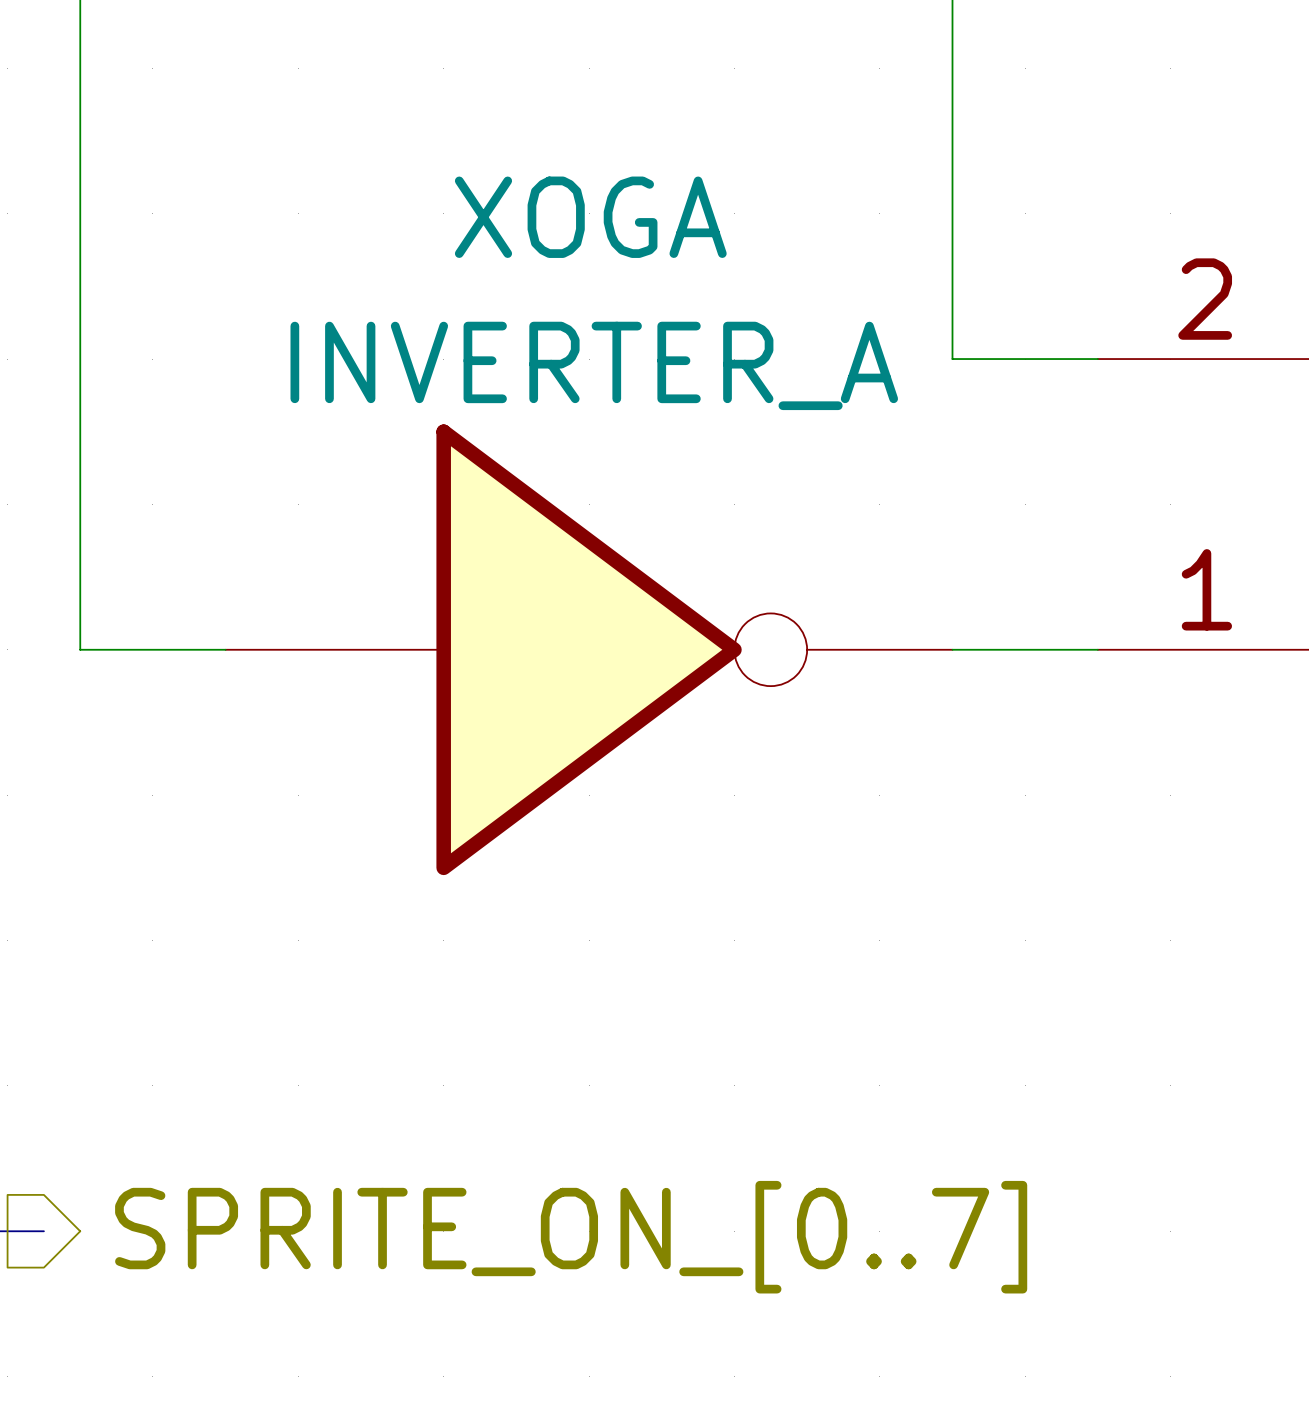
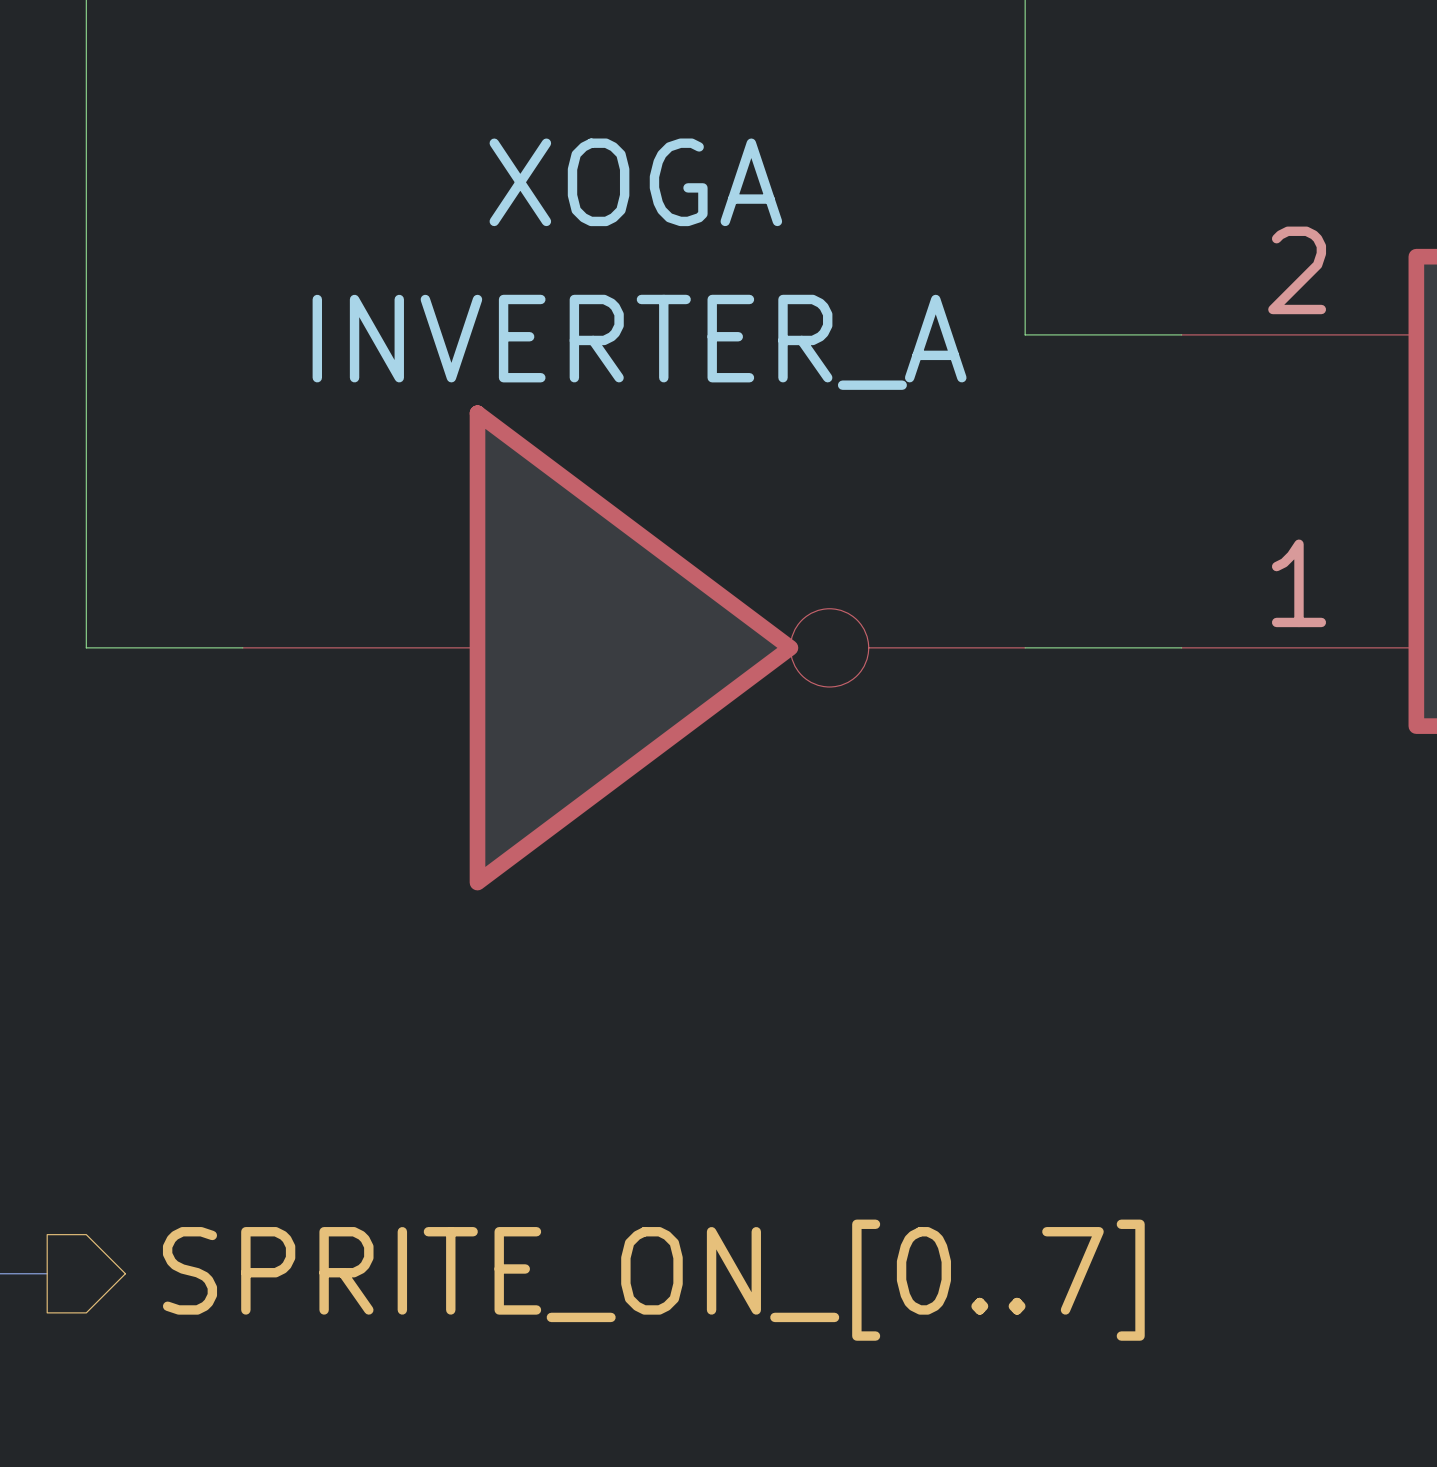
hierarchical label position: SPRITE_ON_[0..7] (571, 1237) -> SPRITE_ON_[0..7] (653, 1280)

